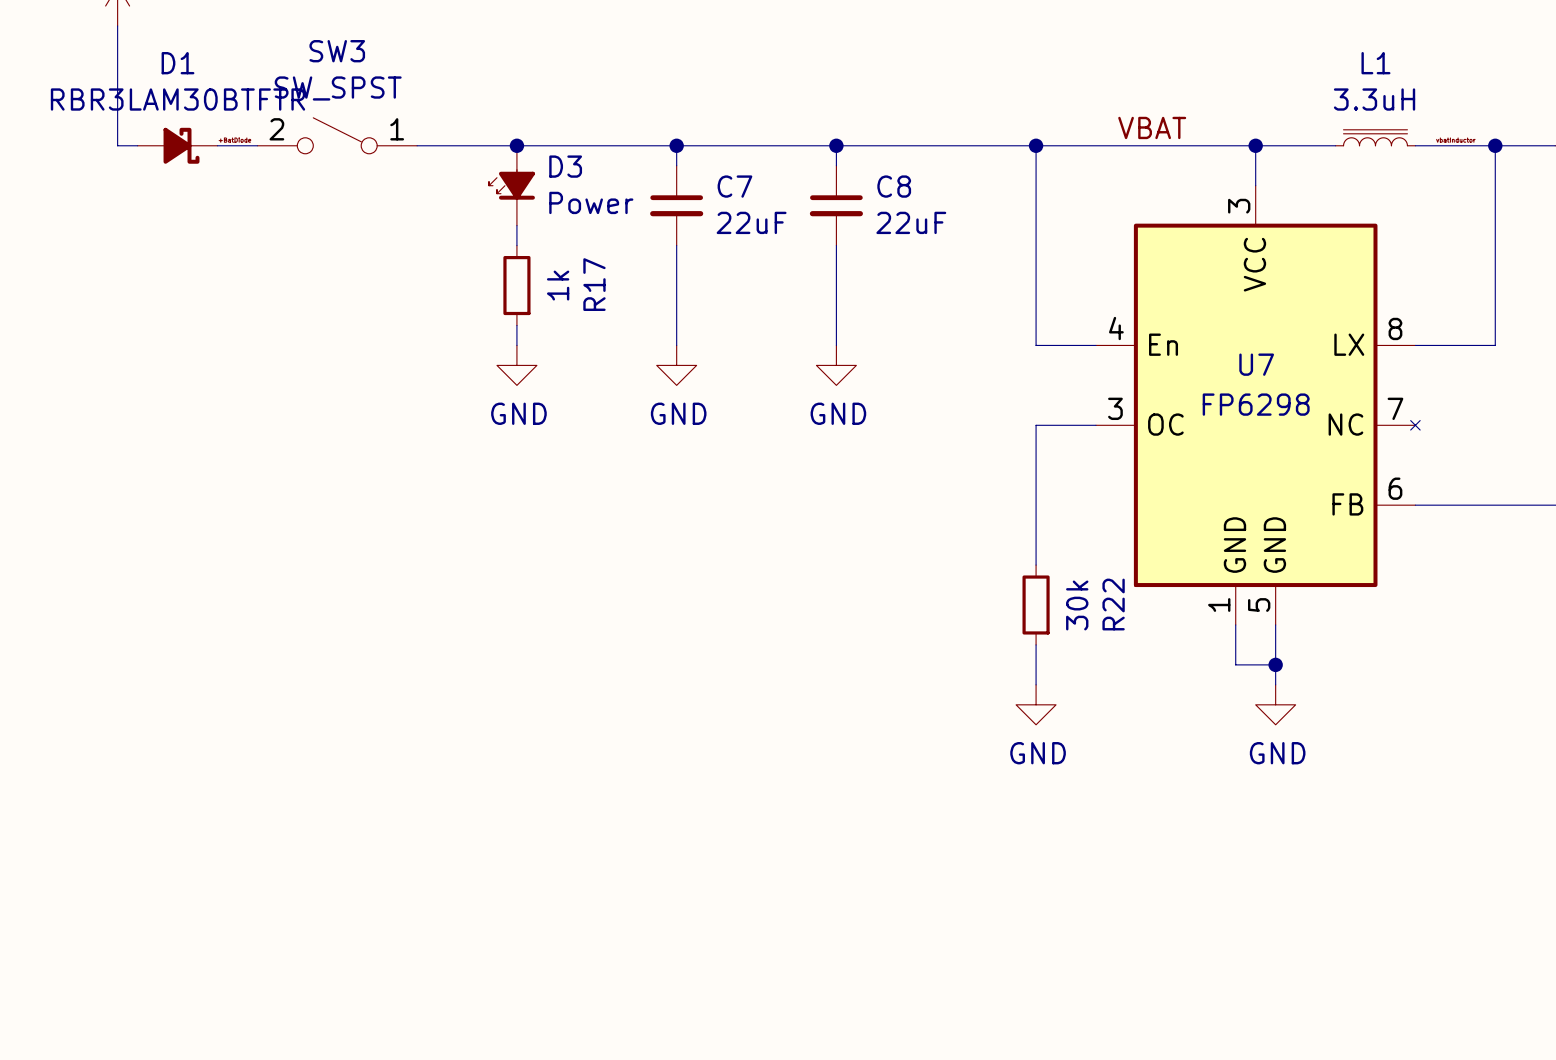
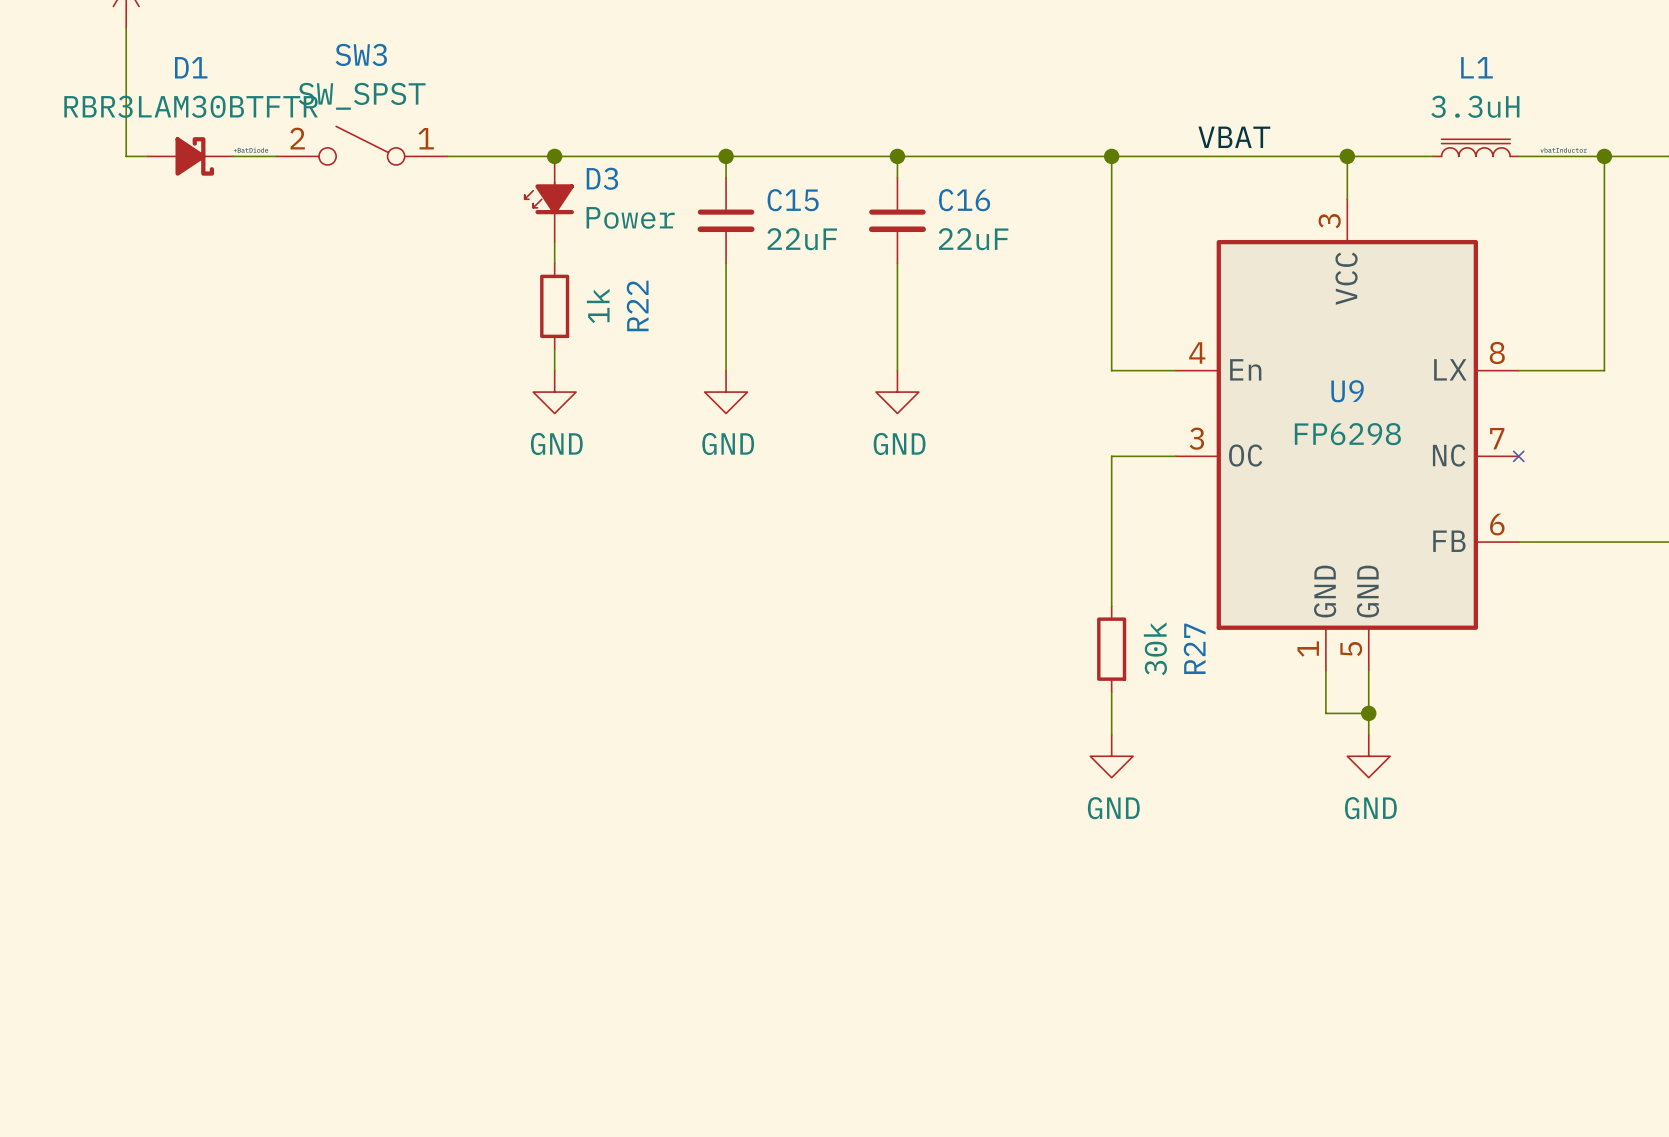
C7 name: C7 (734, 186) -> C15 (793, 200)
C8 name: C8 (894, 186) -> C16 (964, 200)
R17 name: R17 (594, 284) -> R22 (637, 305)
U7 name: U7 (1256, 364) -> U9 (1347, 391)
R22 name: R22 (1113, 604) -> R27 (1194, 648)

